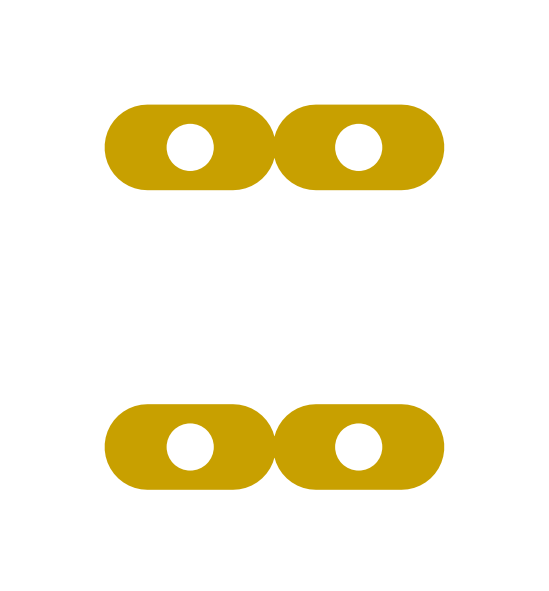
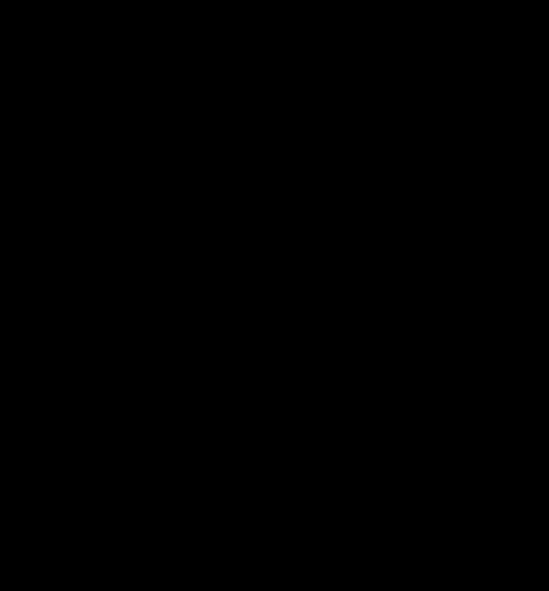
part: (274, 147) -> none
part: (274, 446) -> none

